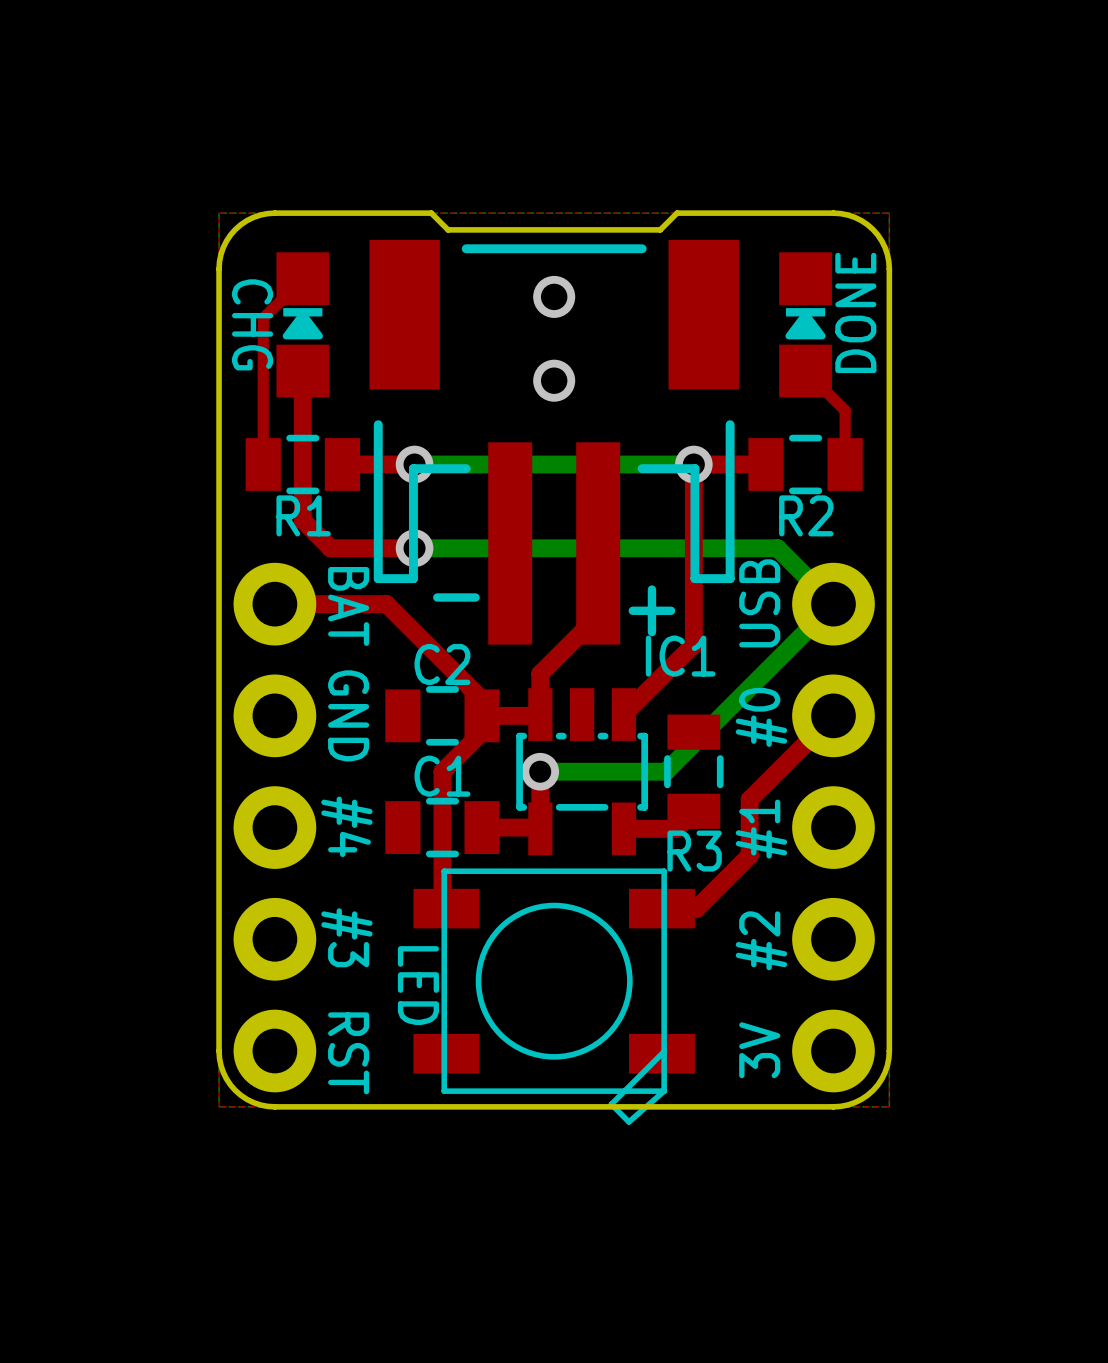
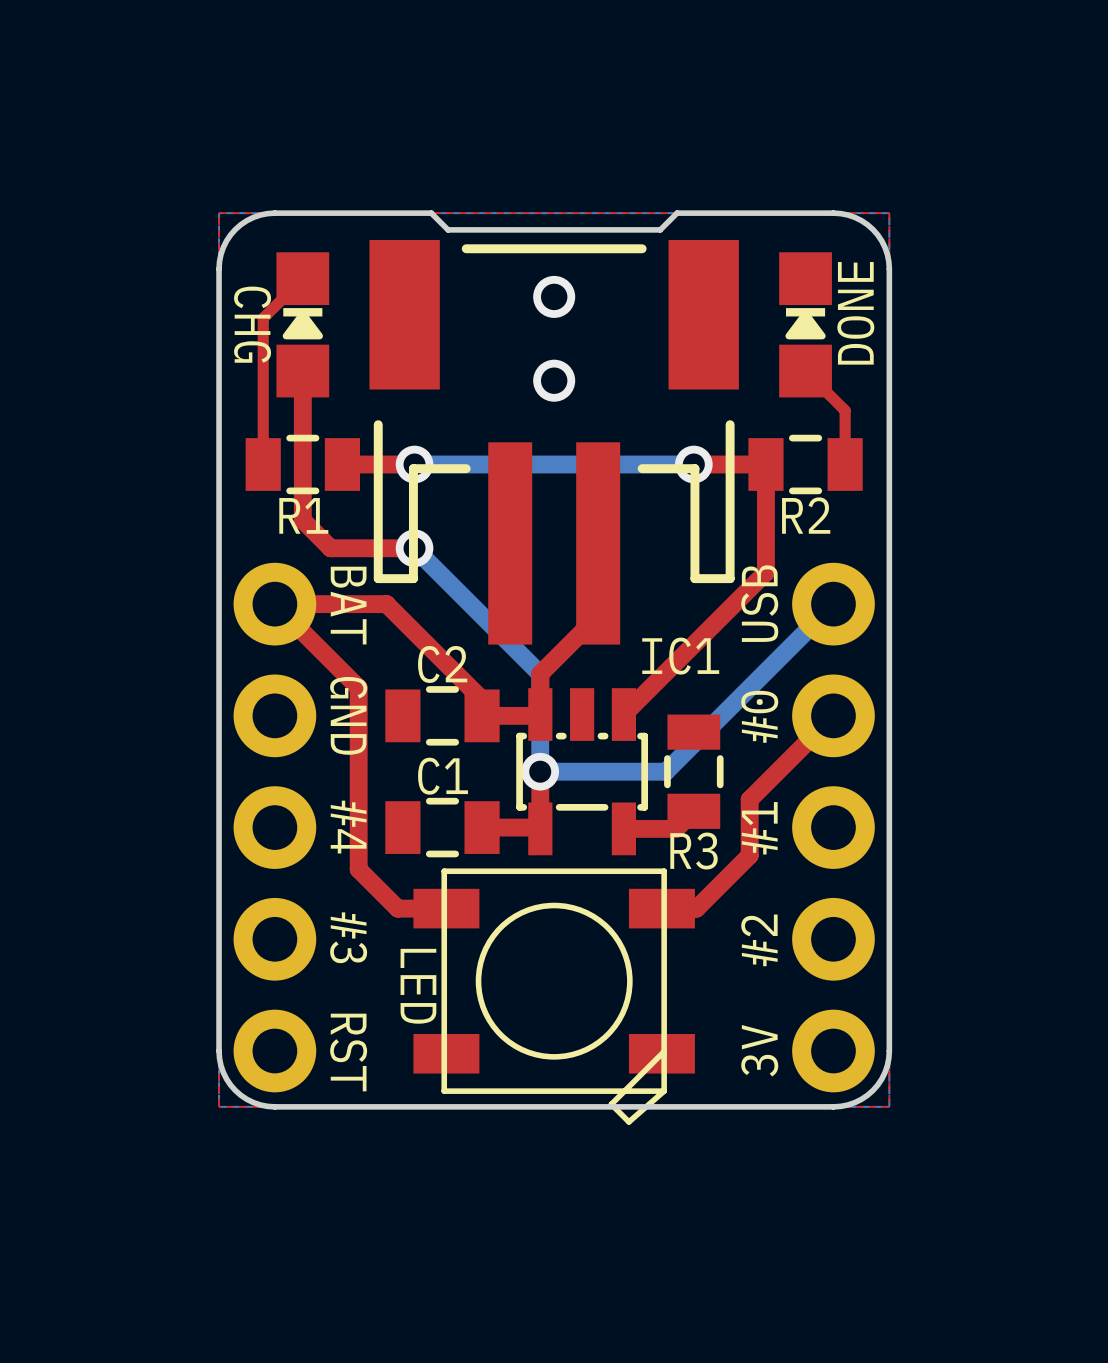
top track: (693, 464) (693, 644) -> (765, 464) (765, 572) (693, 644)
bottom track: (414, 548) (777, 548) (833, 604) -> (414, 548) (540, 673) (540, 771)
text: - (456, 597) -> none
text: + (651, 610) -> none
top track: (482, 715) (482, 732) (442, 771) (442, 904) (446, 908) -> (274, 604) (358, 687) (358, 869) (397, 908) (446, 908)

